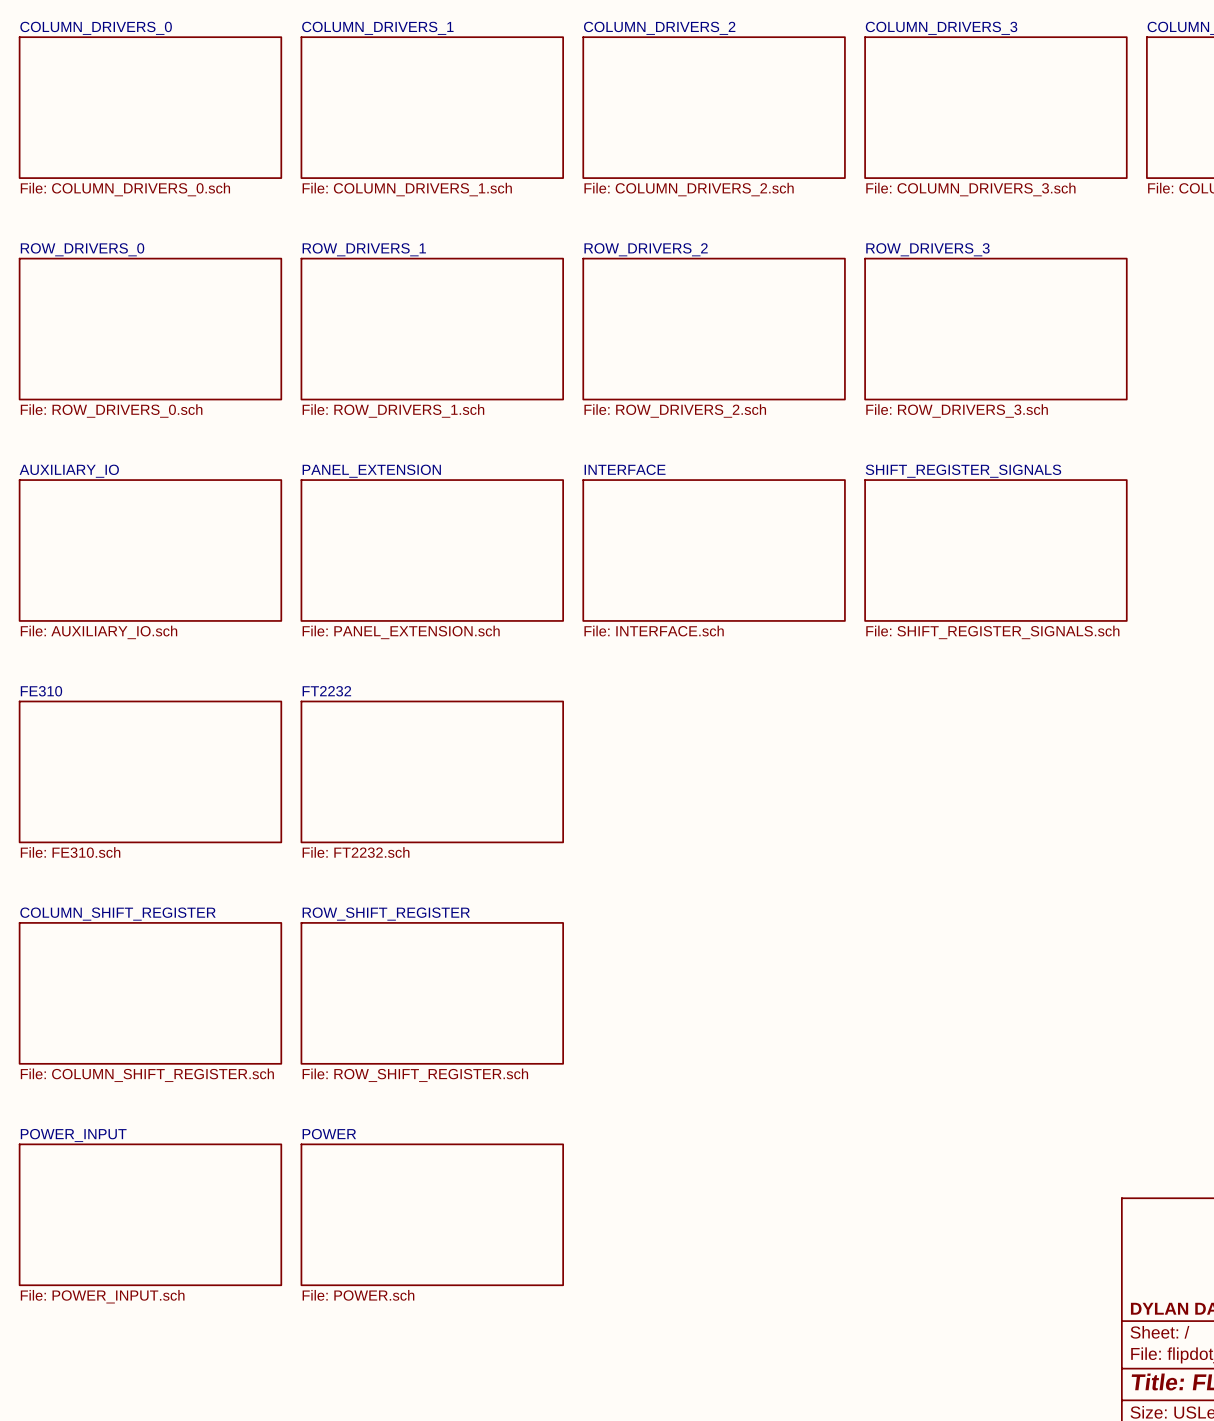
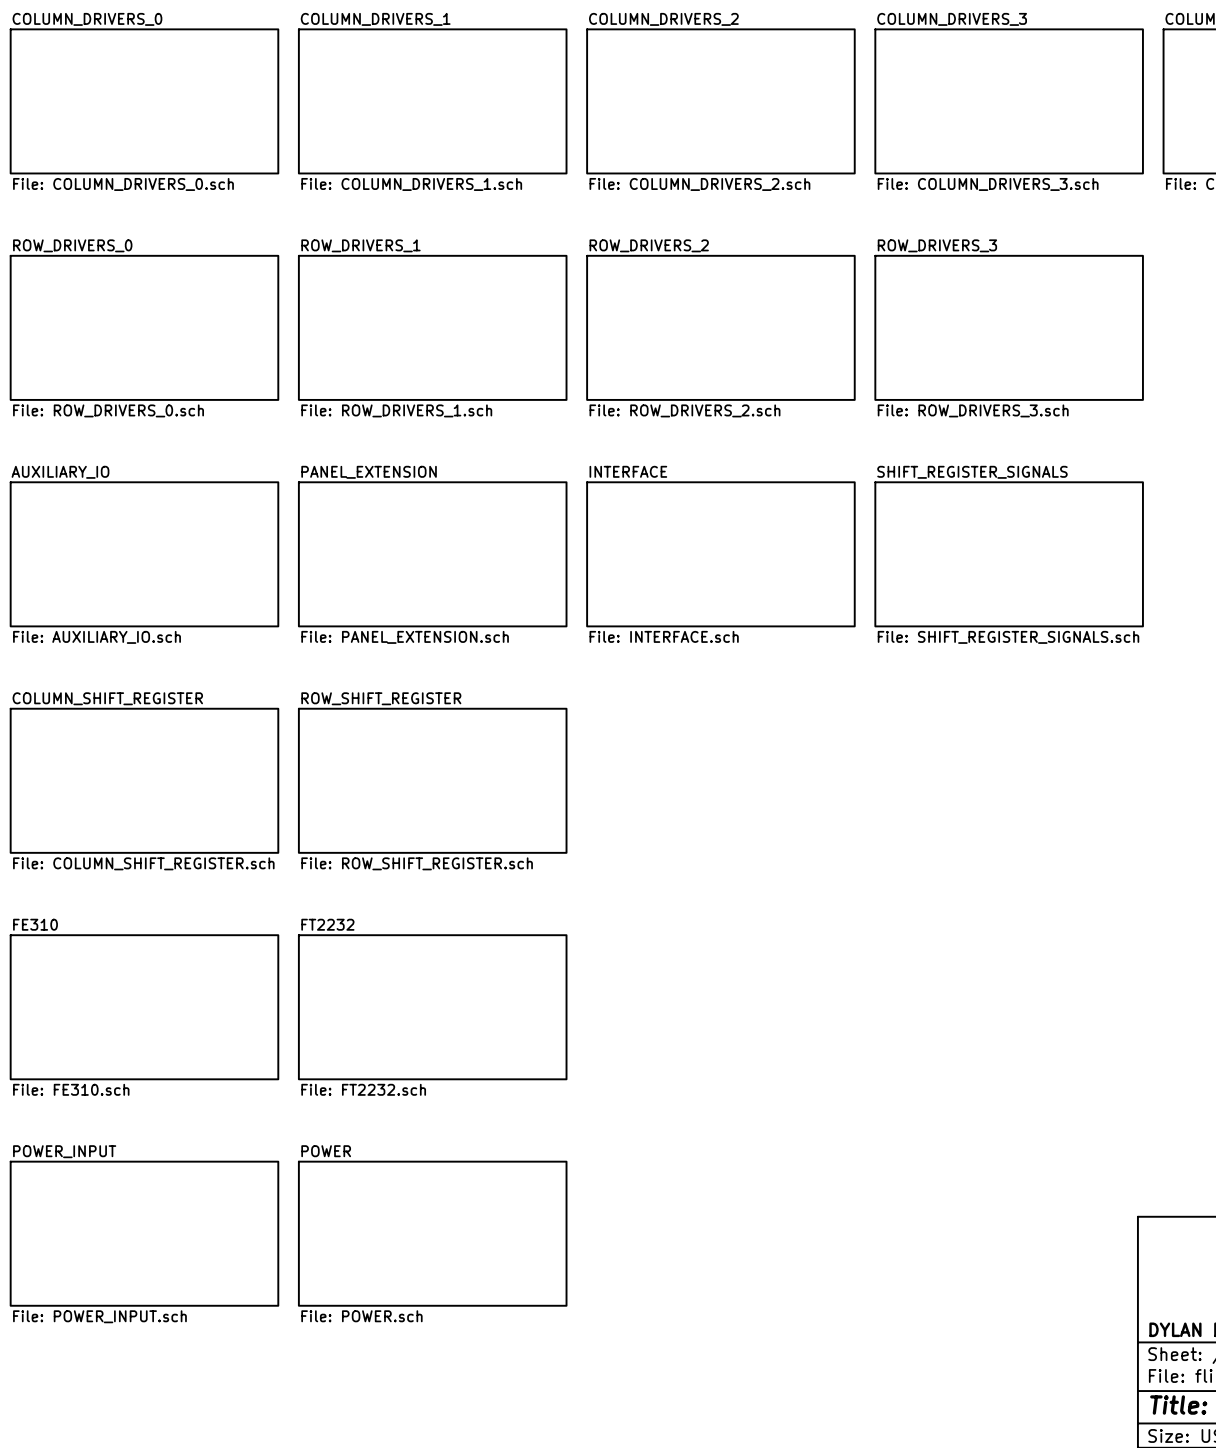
sheet FE310 name: FE310 (41, 691) -> COLUMN_SHIFT_REGISTER (107, 698)
sheet FT2232 name: FT2232 (326, 691) -> ROW_SHIFT_REGISTER (381, 698)
sheet FE310 value: File: FE310.sch (70, 852) -> File: COLUMN_SHIFT_REGISTER.sch (143, 863)
sheet FT2232 value: File: FT2232.sch (356, 852) -> File: ROW_SHIFT_REGISTER.sch (417, 863)
sheet COLUMN_SHIFT_REGISTER name: COLUMN_SHIFT_REGISTER (118, 914) -> FE310 (35, 924)
sheet ROW_SHIFT_REGISTER name: ROW_SHIFT_REGISTER (386, 914) -> FT2232 (327, 924)
sheet COLUMN_SHIFT_REGISTER value: File: COLUMN_SHIFT_REGISTER.sch (147, 1075) -> File: FE310.sch (71, 1089)
sheet ROW_SHIFT_REGISTER value: File: ROW_SHIFT_REGISTER.sch (415, 1075) -> File: FT2232.sch (363, 1089)

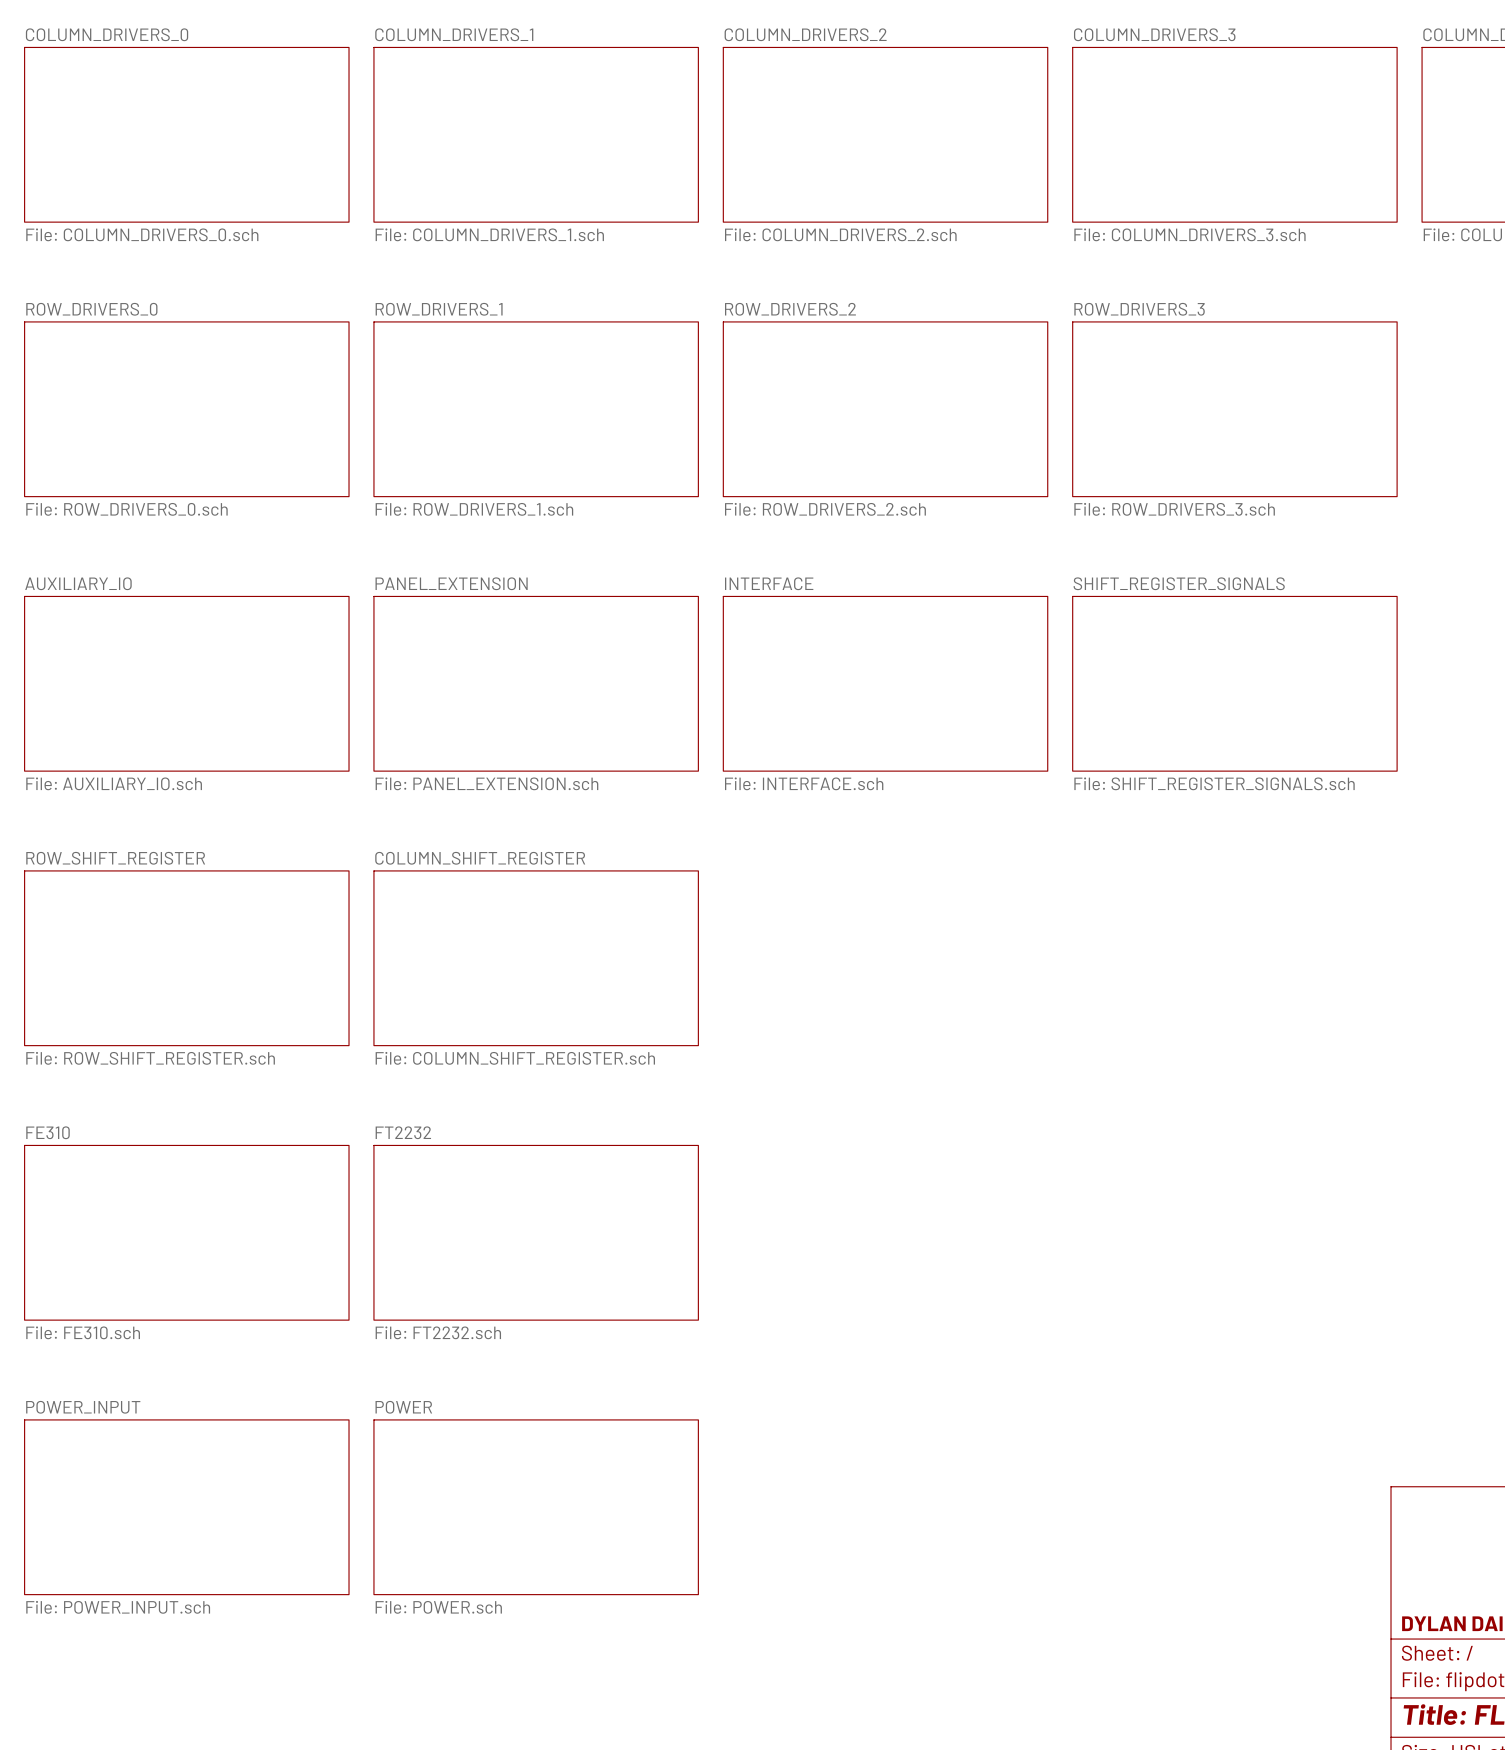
sheet COLUMN_SHIFT_REGISTER name: COLUMN_SHIFT_REGISTER (107, 698) -> ROW_SHIFT_REGISTER (115, 858)
sheet ROW_SHIFT_REGISTER name: ROW_SHIFT_REGISTER (381, 698) -> COLUMN_SHIFT_REGISTER (480, 858)
sheet COLUMN_SHIFT_REGISTER value: File: COLUMN_SHIFT_REGISTER.sch (143, 863) -> File: ROW_SHIFT_REGISTER.sch (150, 1058)
sheet ROW_SHIFT_REGISTER value: File: ROW_SHIFT_REGISTER.sch (417, 863) -> File: COLUMN_SHIFT_REGISTER.sch (515, 1058)

